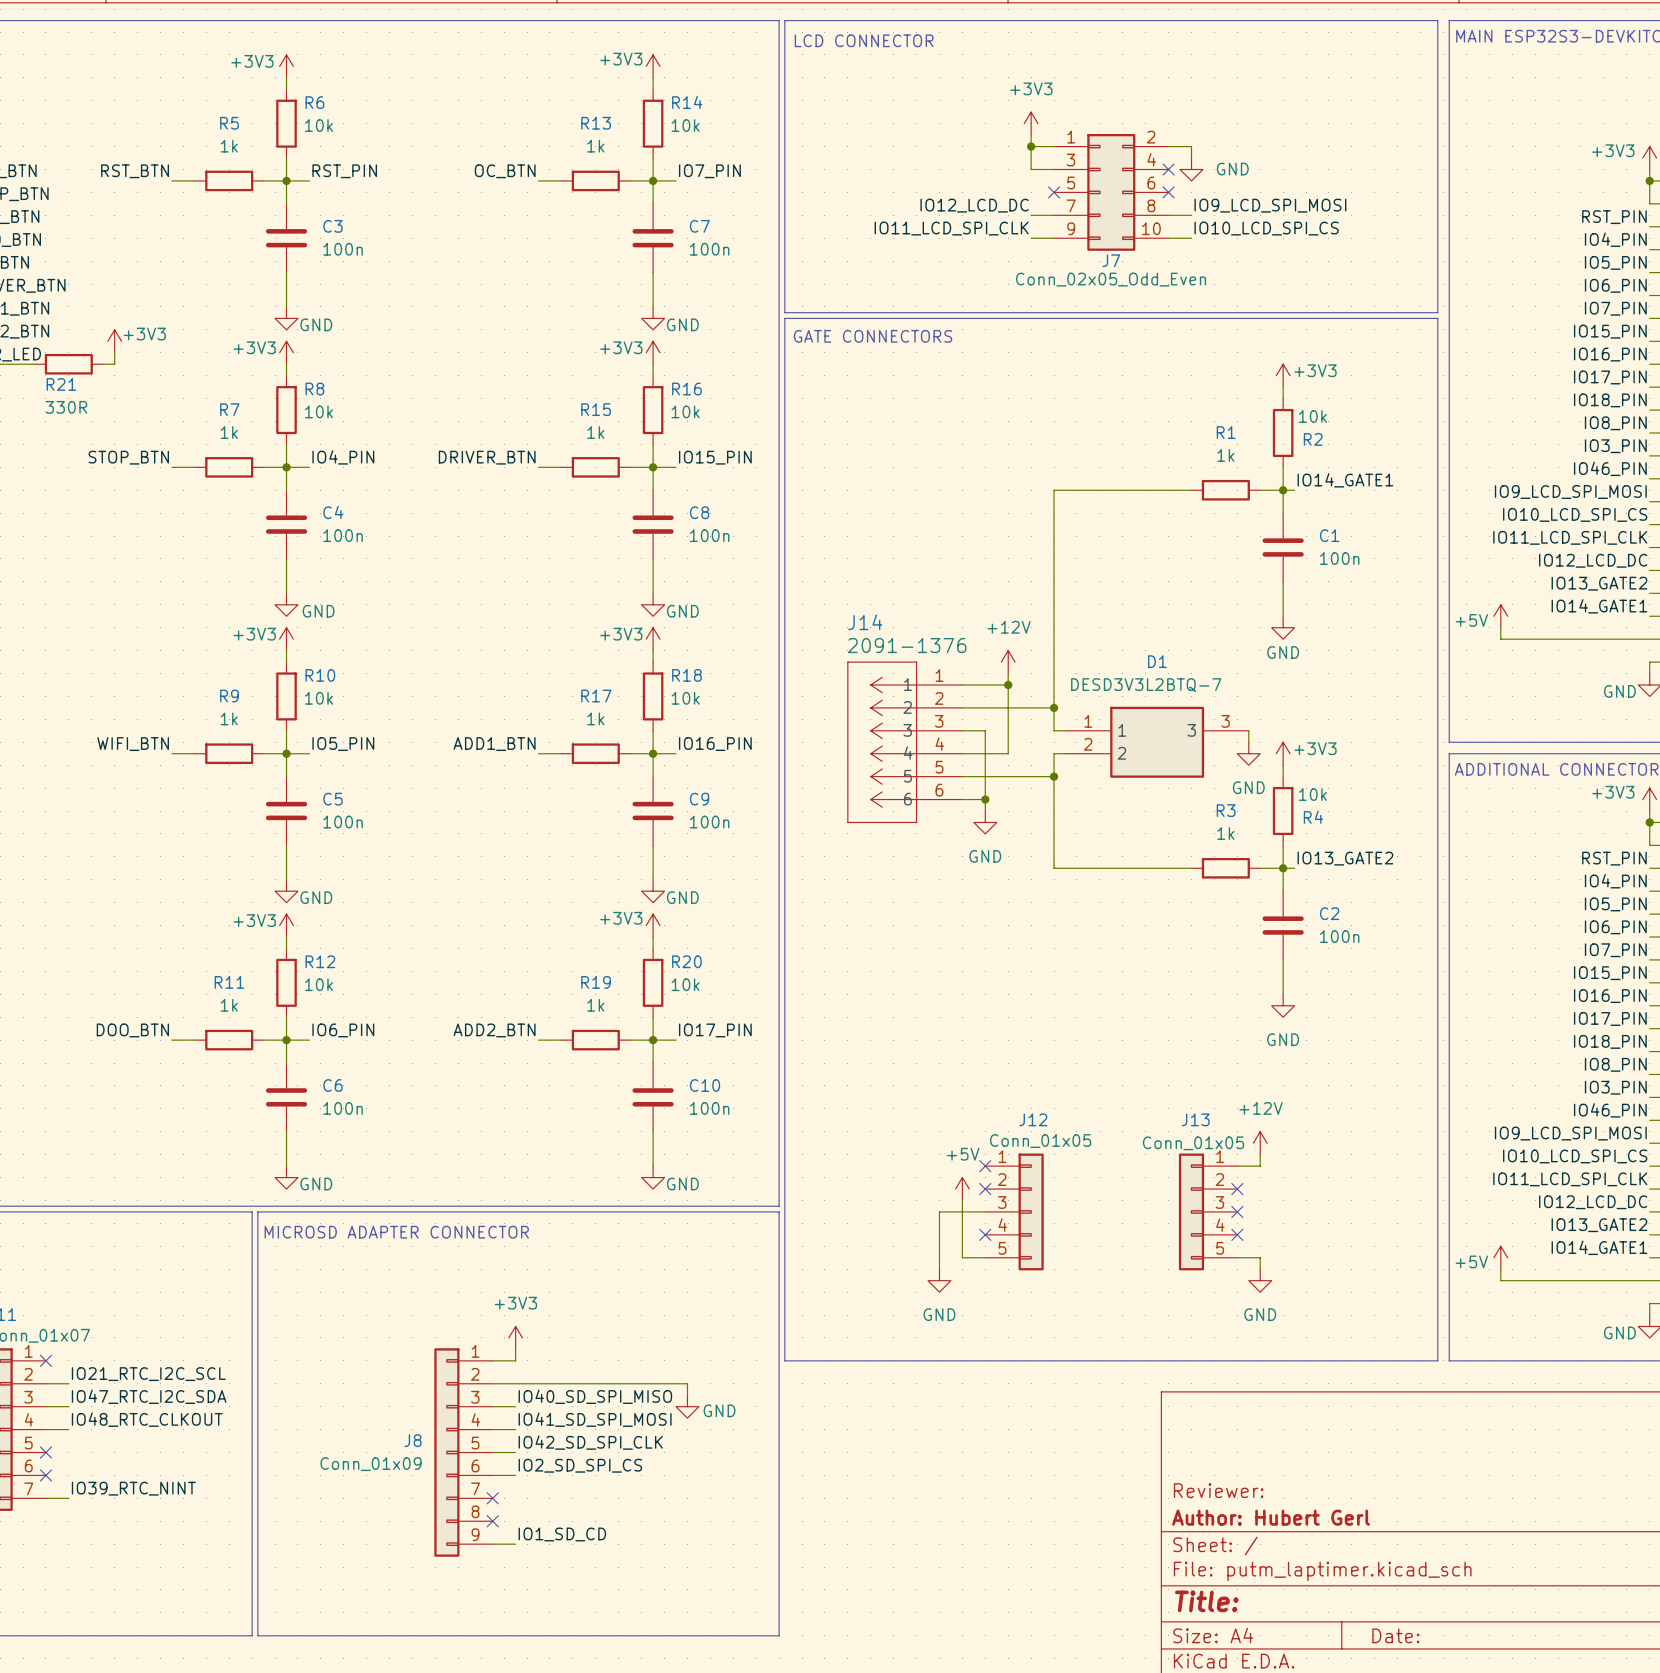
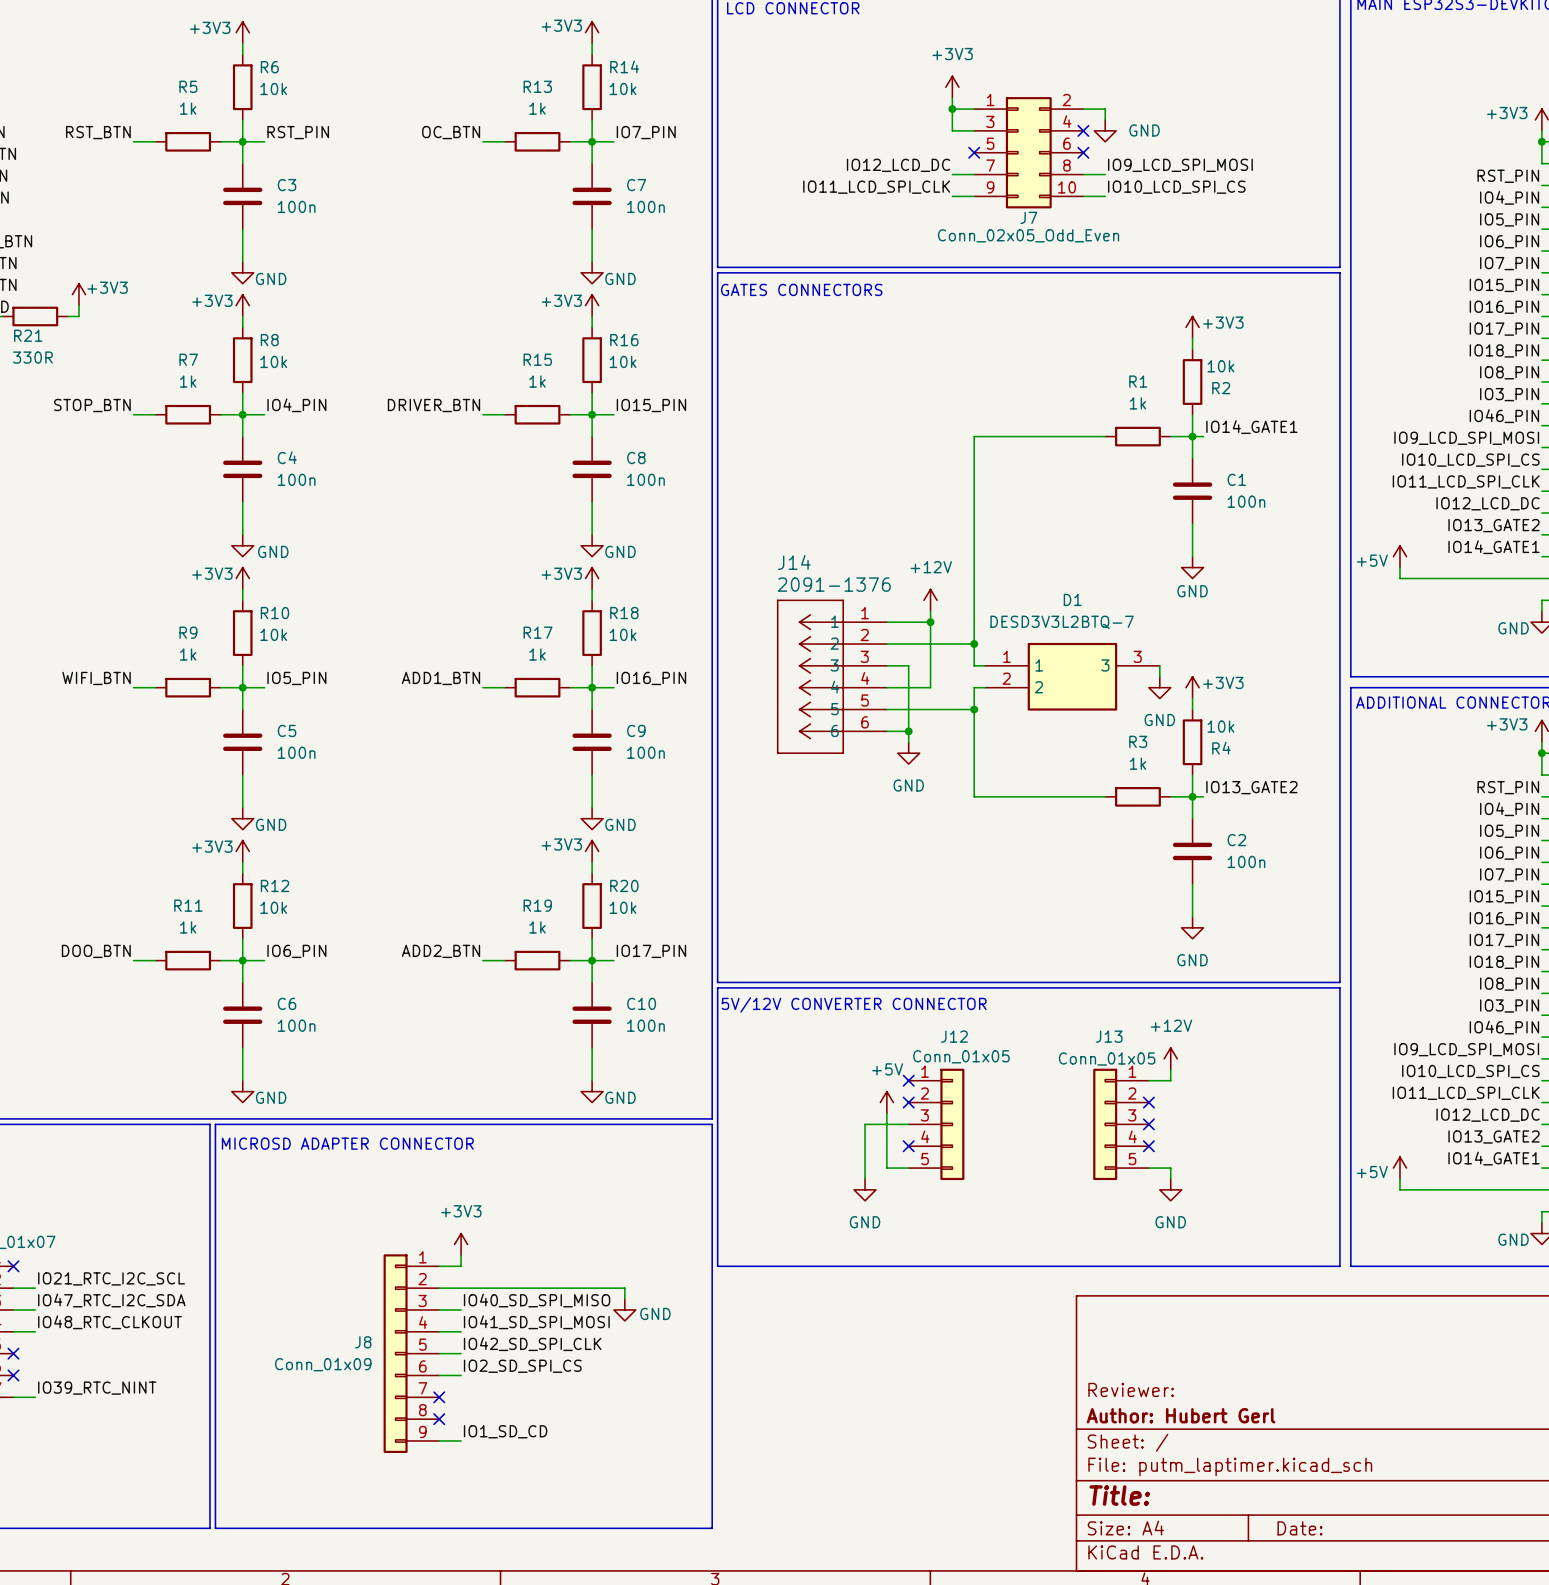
text: GATE CONNECTORS (873, 336) -> GATES CONNECTORS (801, 289)
line: (784, 1063) (784, 1068) -> (717, 982) (1339, 982)
line: (1437, 1063) (1437, 1068) -> (717, 987) (1339, 987)
text: none -> 5V/12V CONVERTER CONNECTOR (854, 1004)

